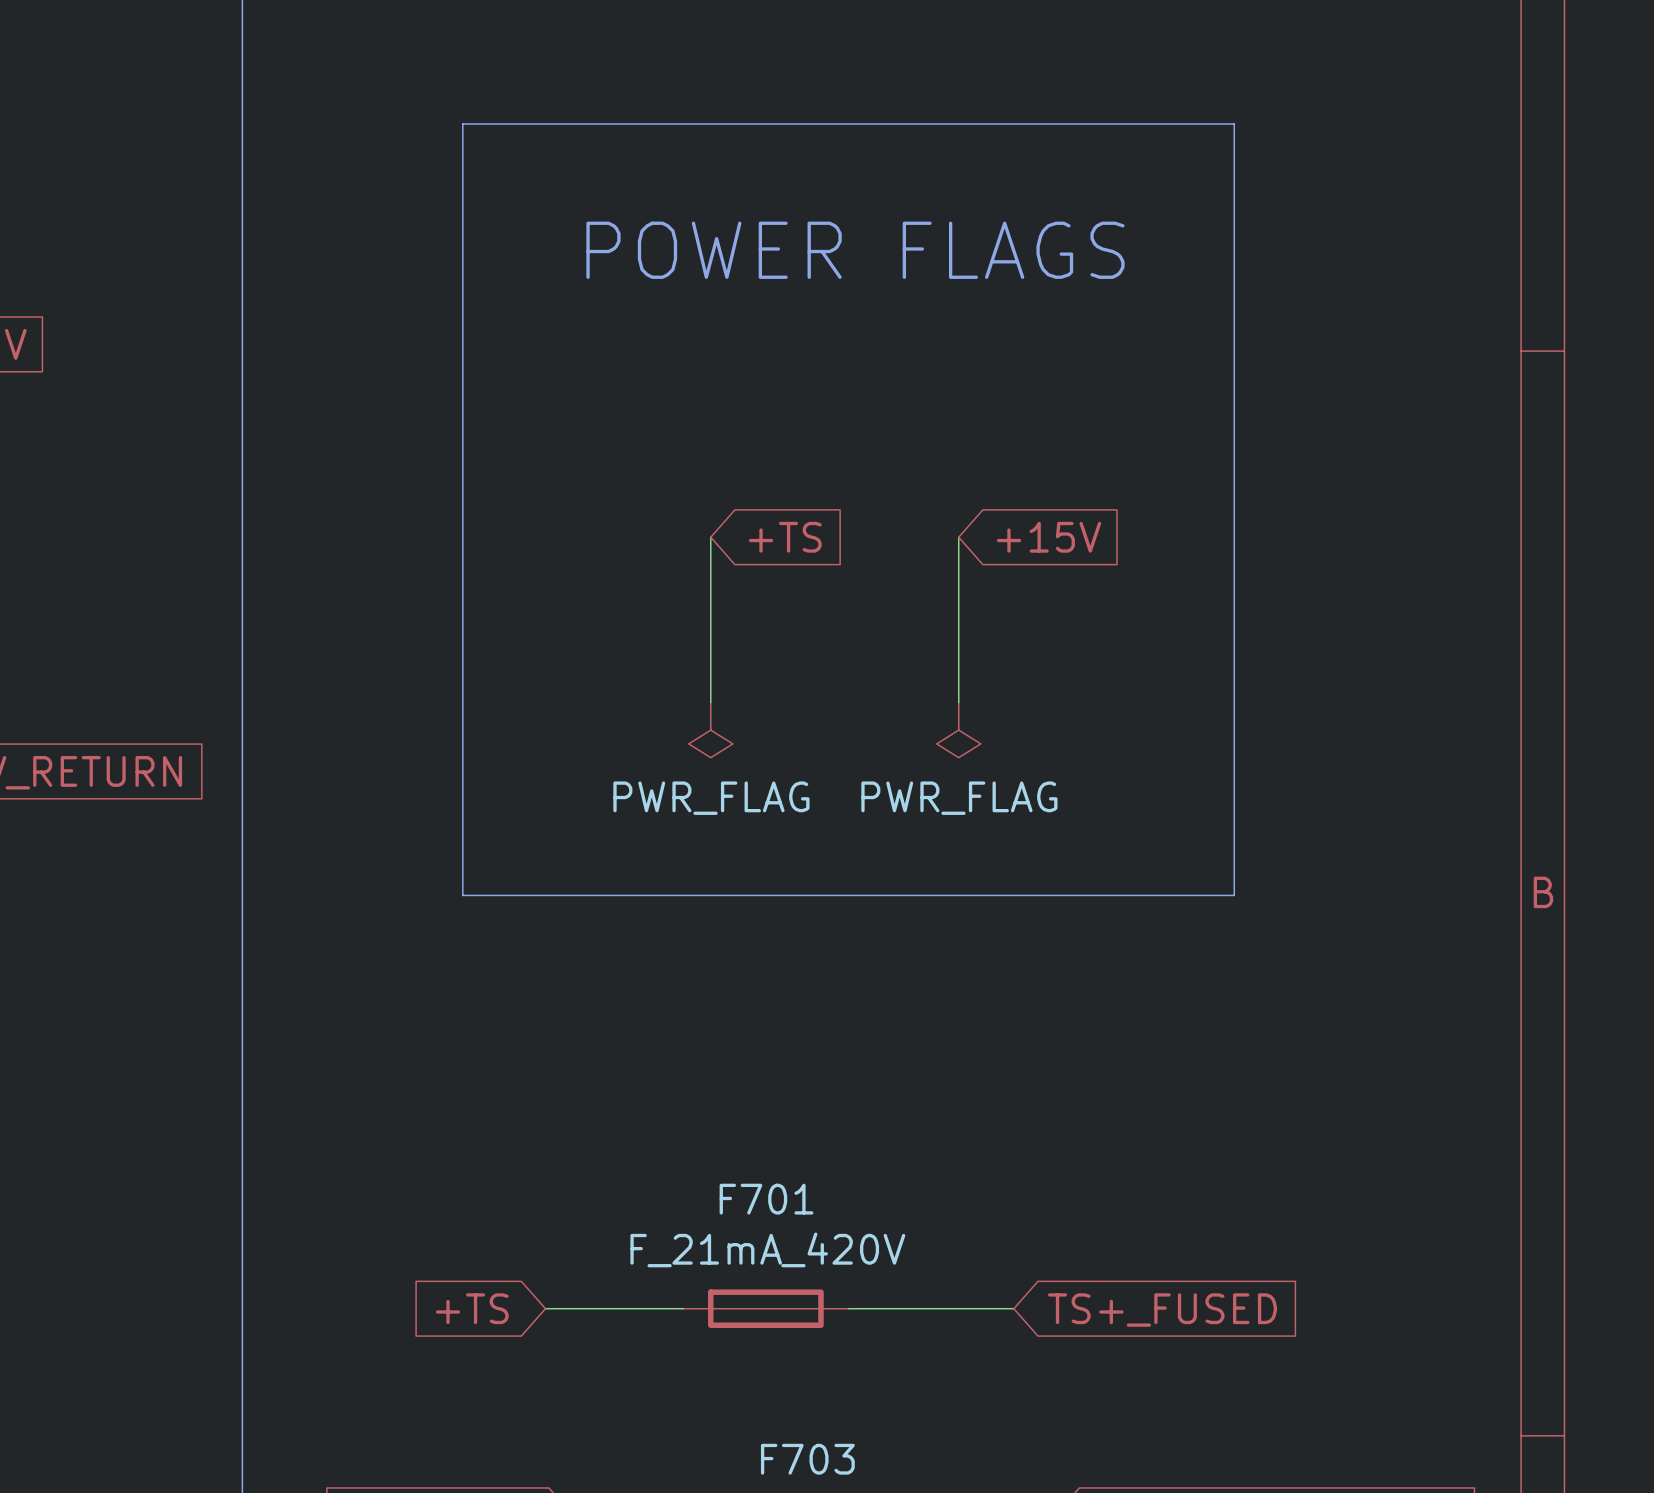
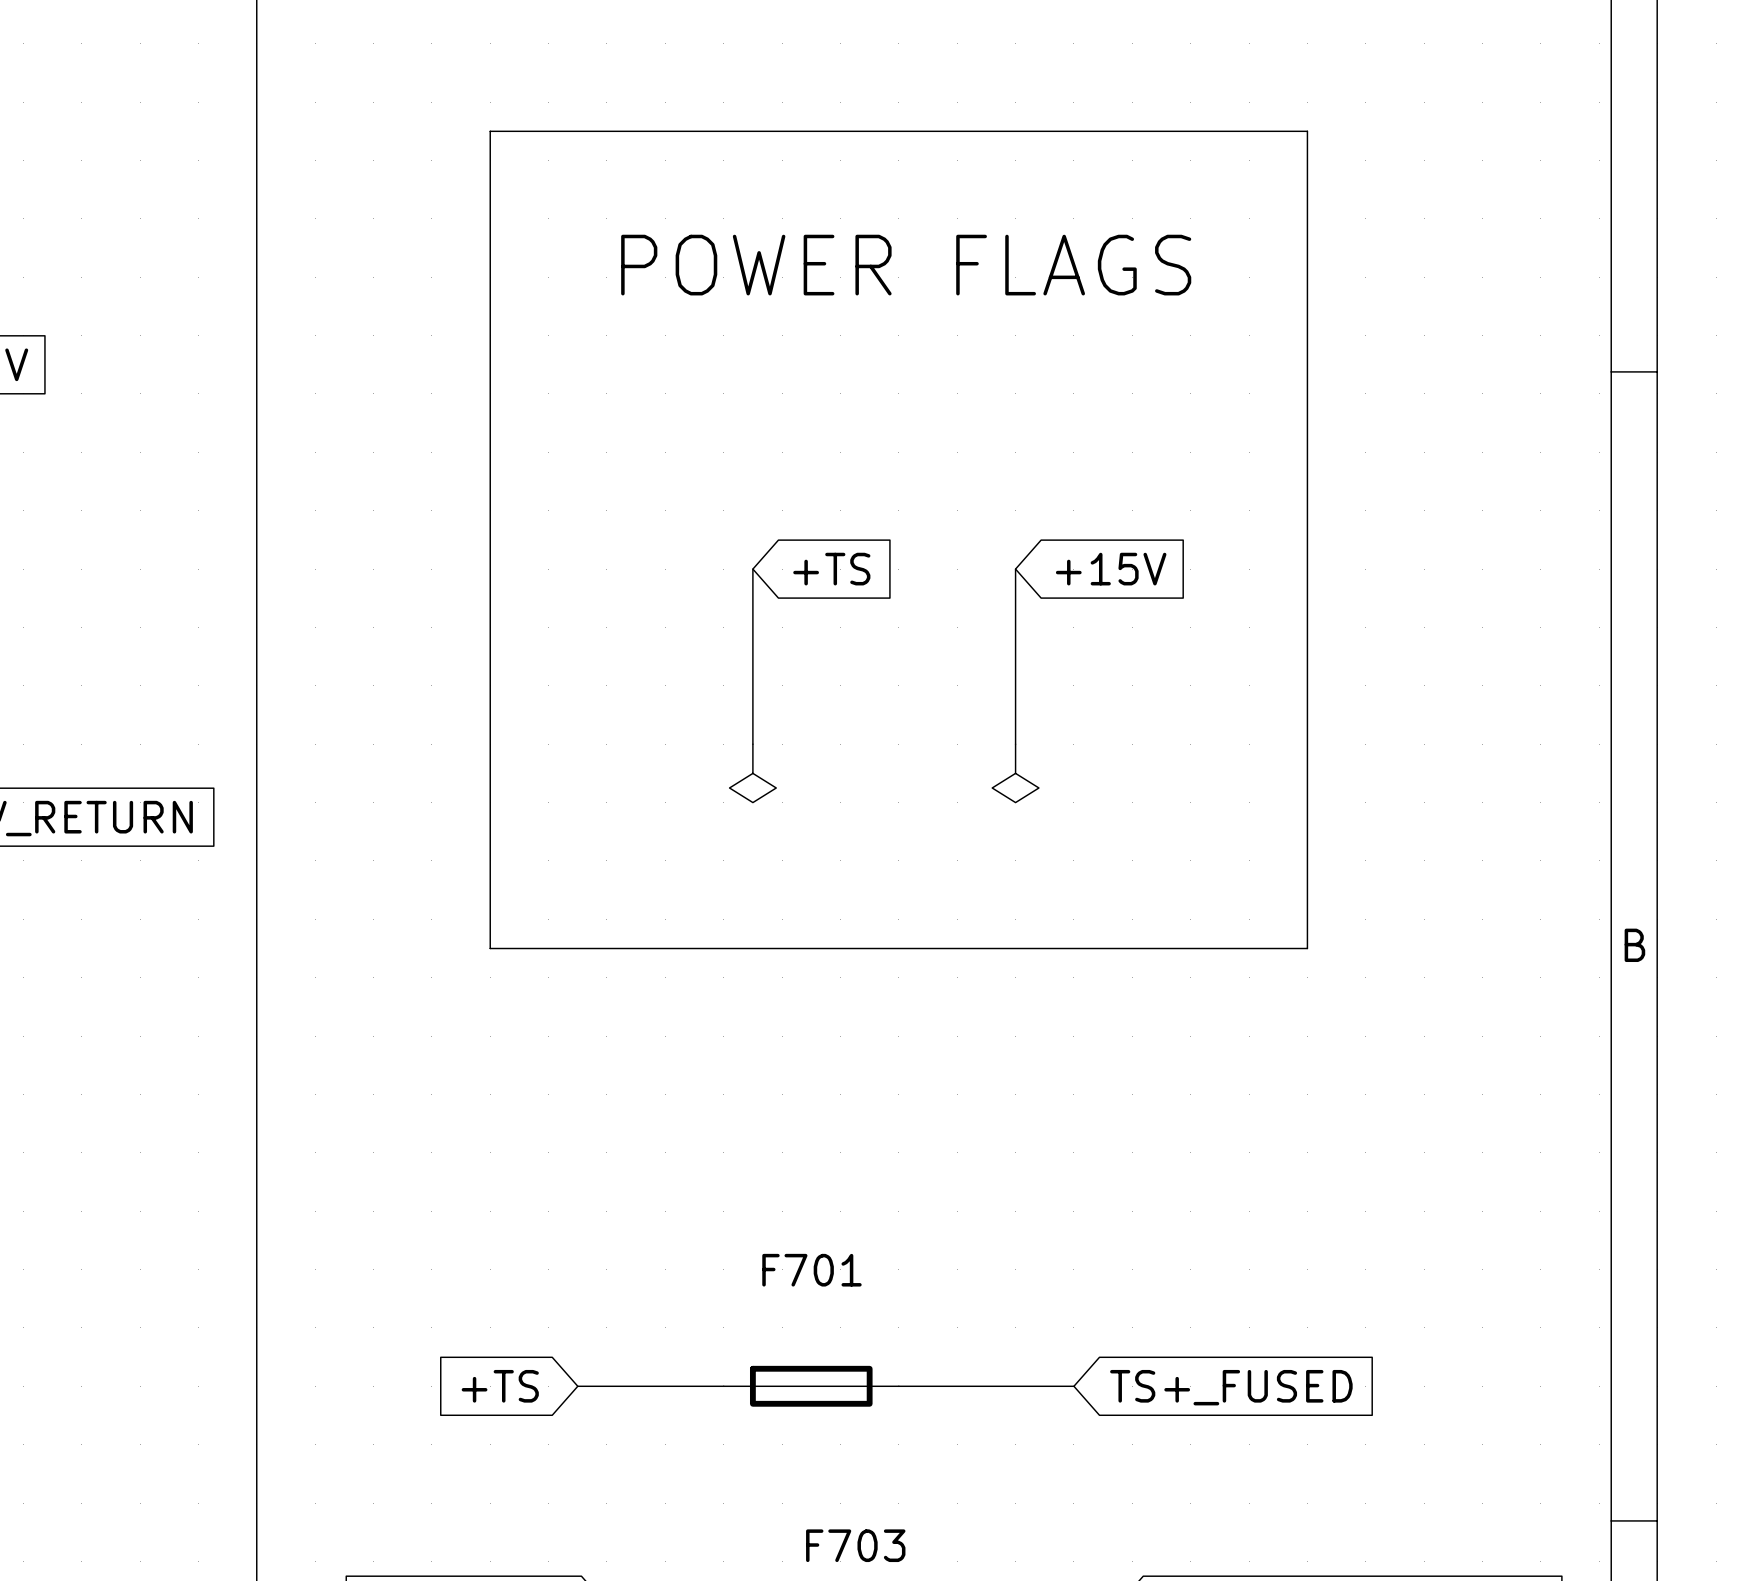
power symbol text: PWR_FLAG (711, 798) -> none
power symbol text: PWR_FLAG (959, 798) -> none
F701 value: F_21mA_420V (767, 1249) -> none

